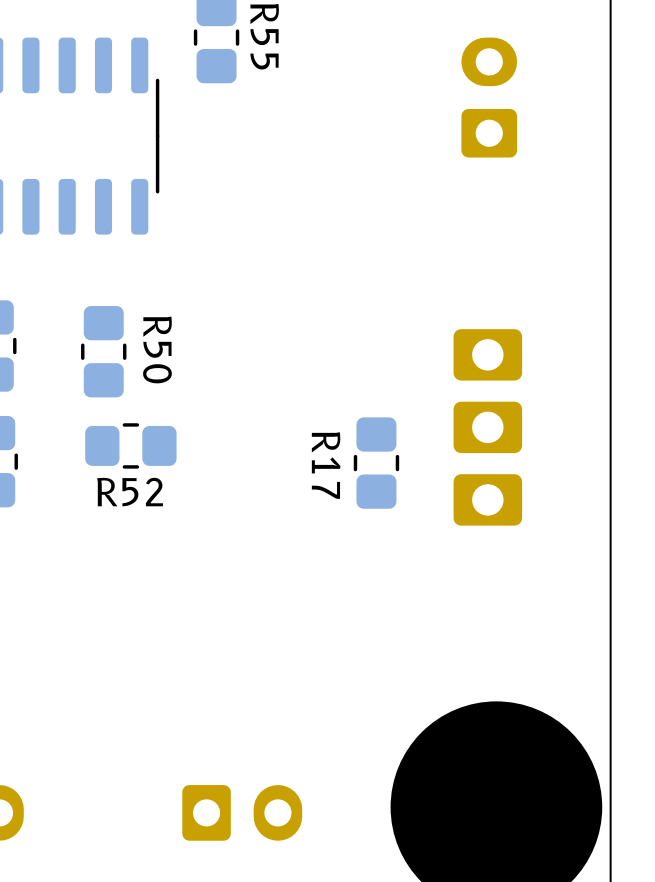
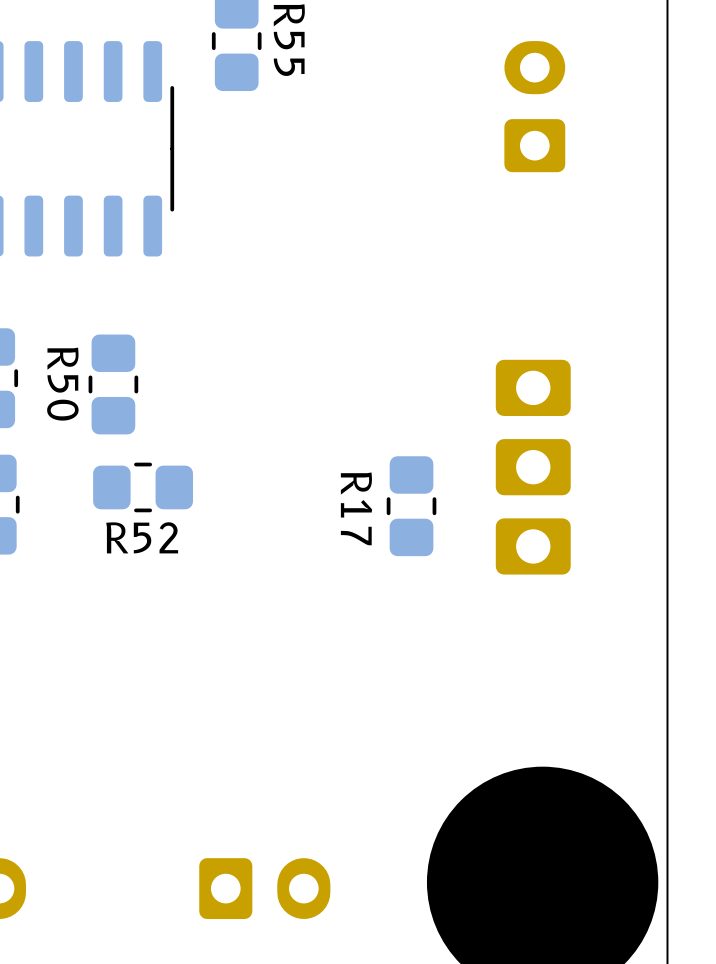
R50 name position: R50 (157, 349) -> R50 (62, 384)

